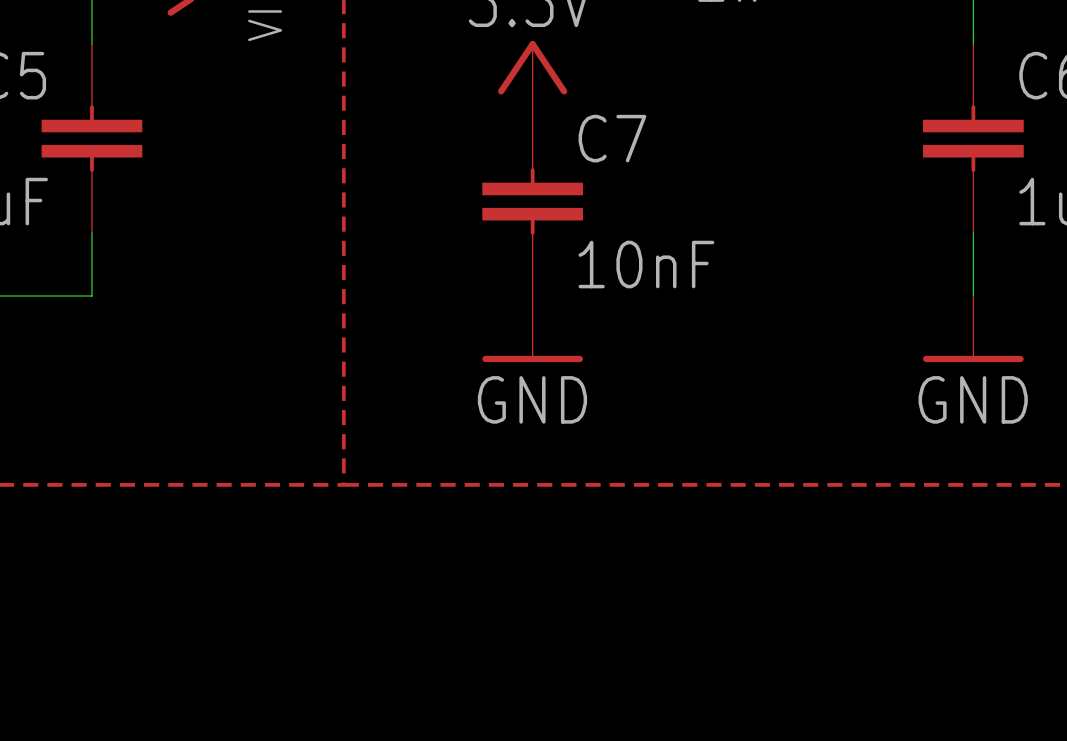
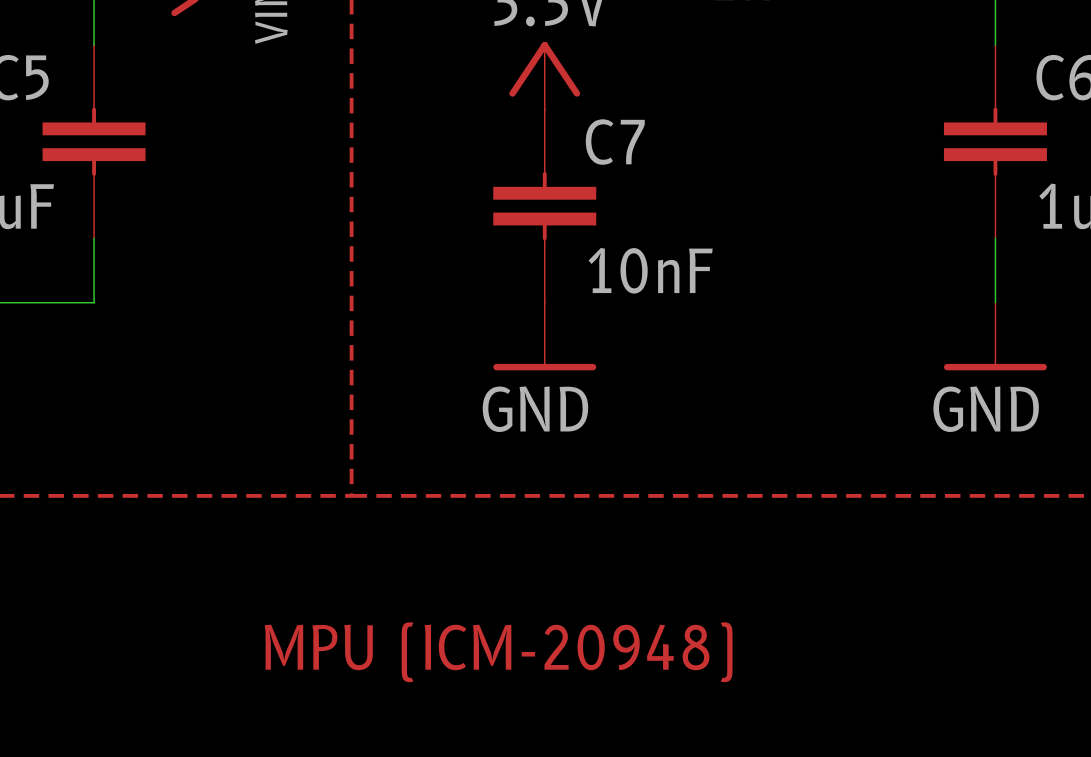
text: none -> MPU (ICM-20948) (498, 652)

